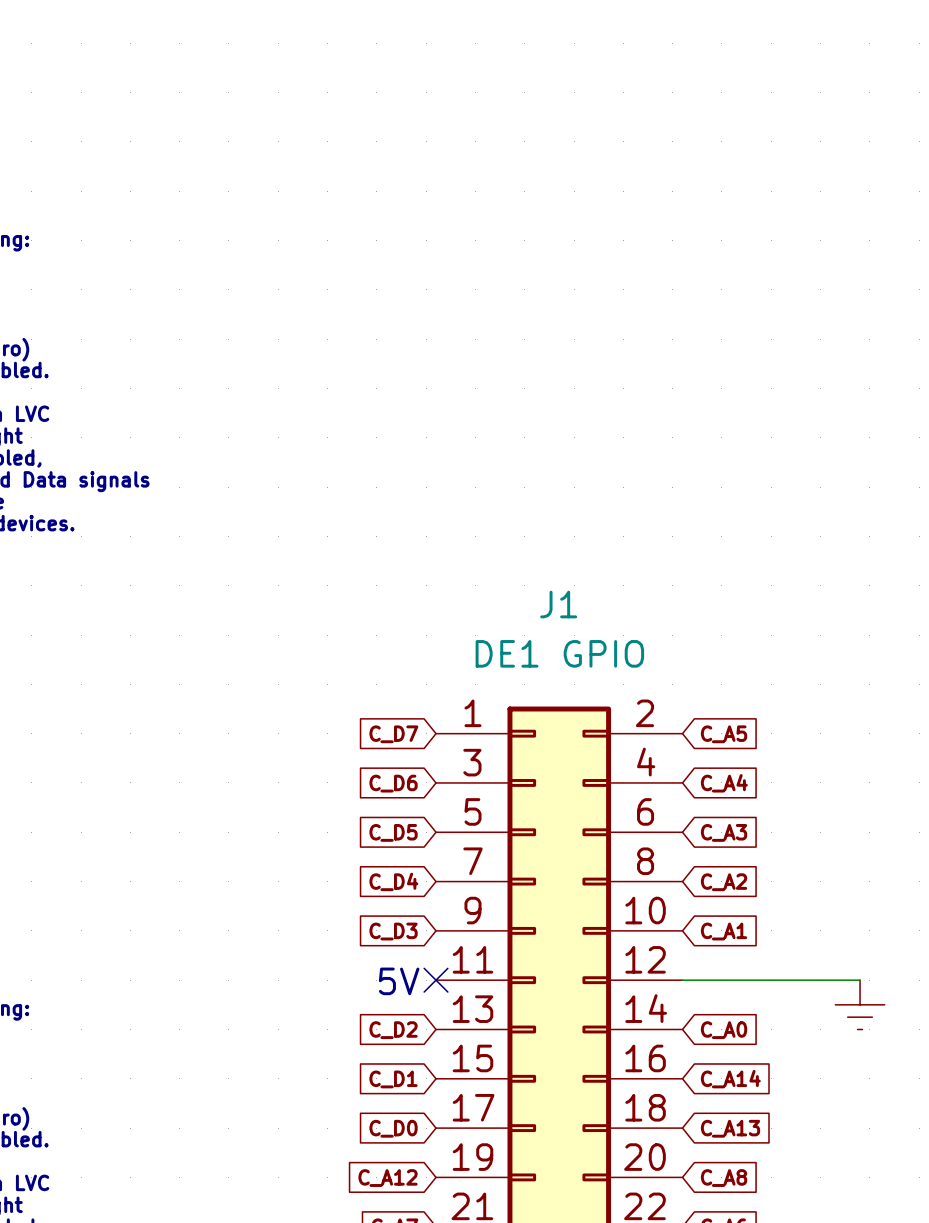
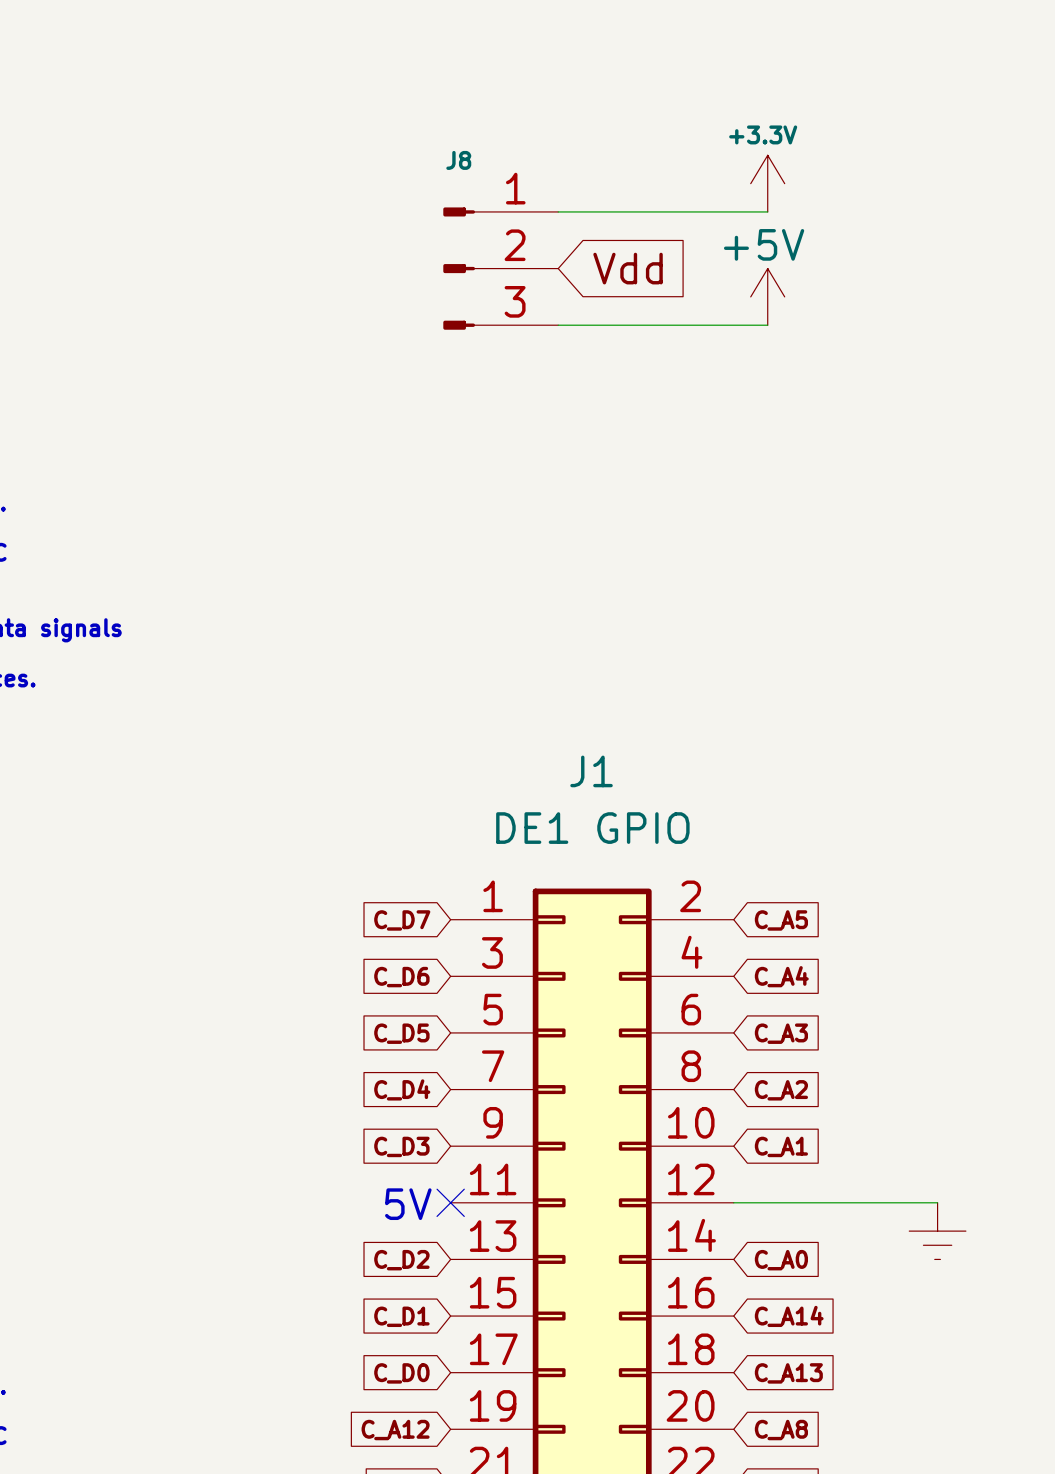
power symbol: none -> +3.3V (767, 183)
wire: none -> (558, 211) (767, 211)
J8: none -> (500, 268)
global label: none -> Vdd (628, 268)
power symbol: none -> +5V (767, 296)
wire: none -> (558, 325) (767, 325)

